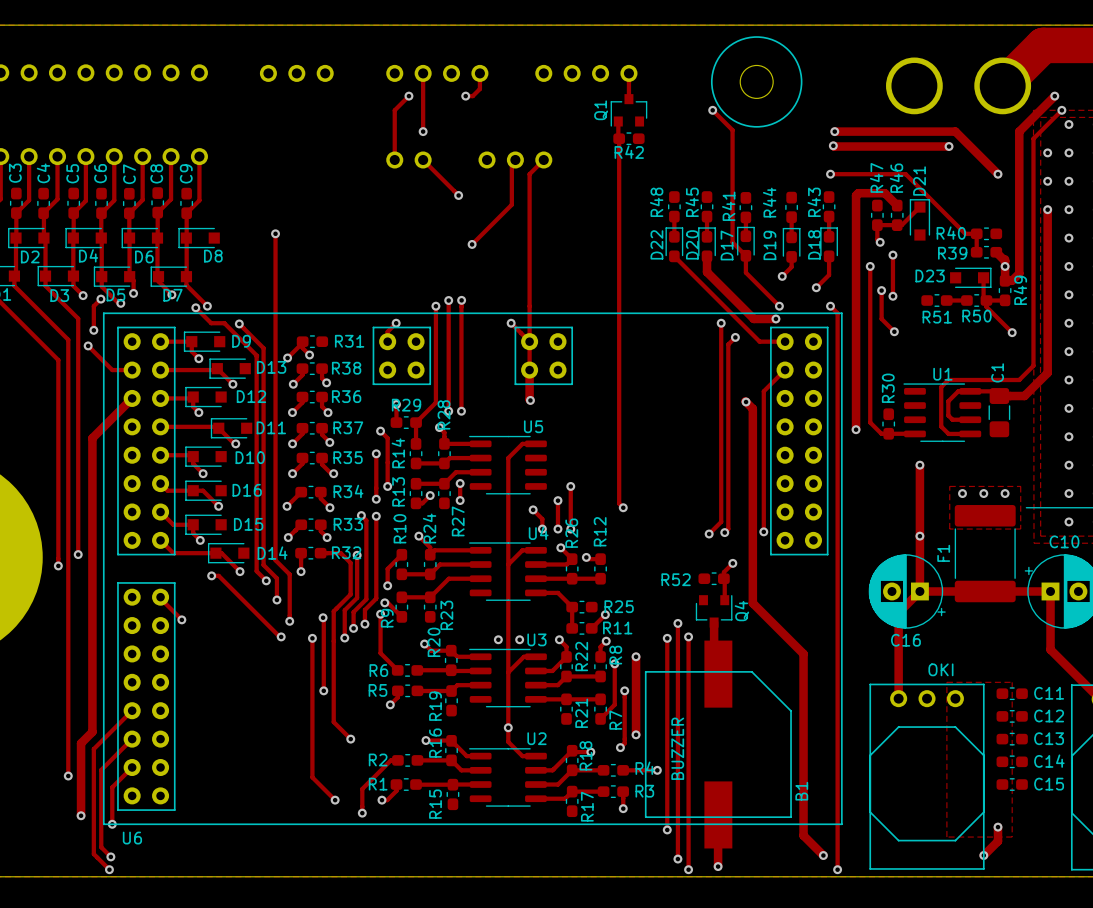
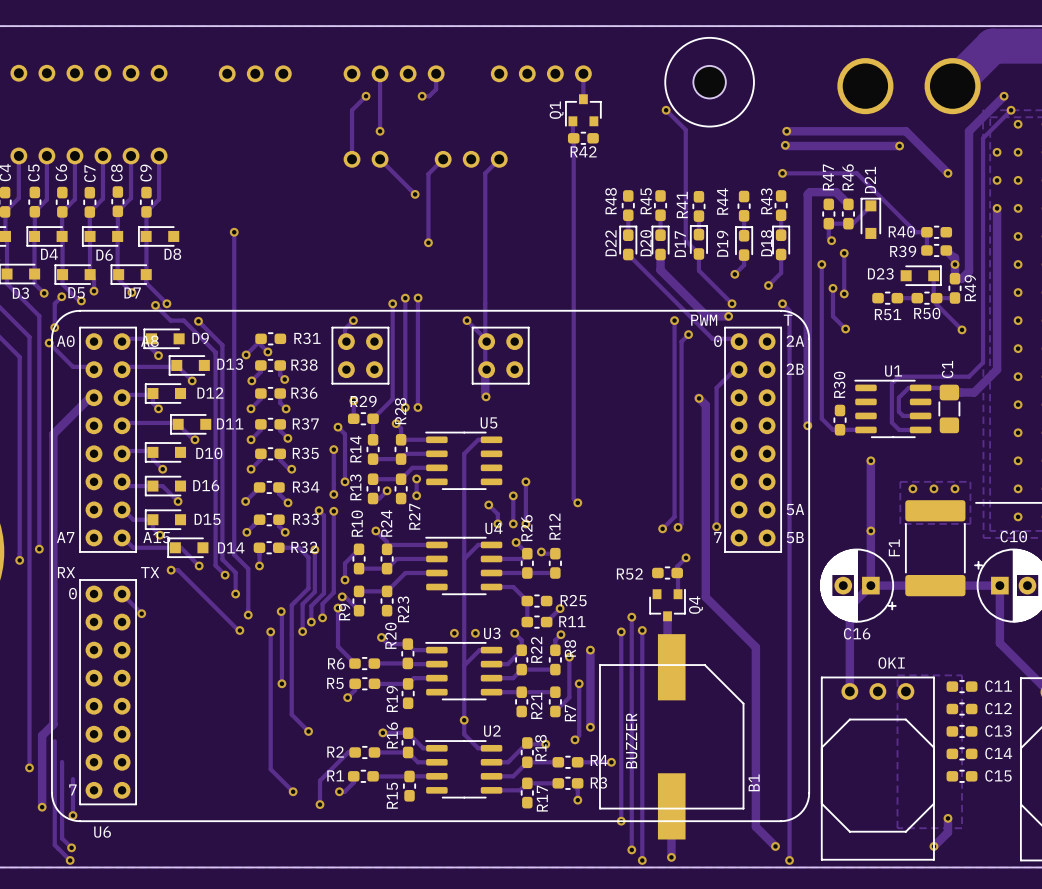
track: (511, 163) (511, 204) (472, 244) -> (443, 159) (428, 174) (428, 242)
U6 footprint: [102, 312, 843, 826] -> [51, 309, 810, 823]
track: (132, 710) (93, 749) -> none
track: (132, 739) (101, 770) -> none
track: (132, 767) (112, 787) -> none

